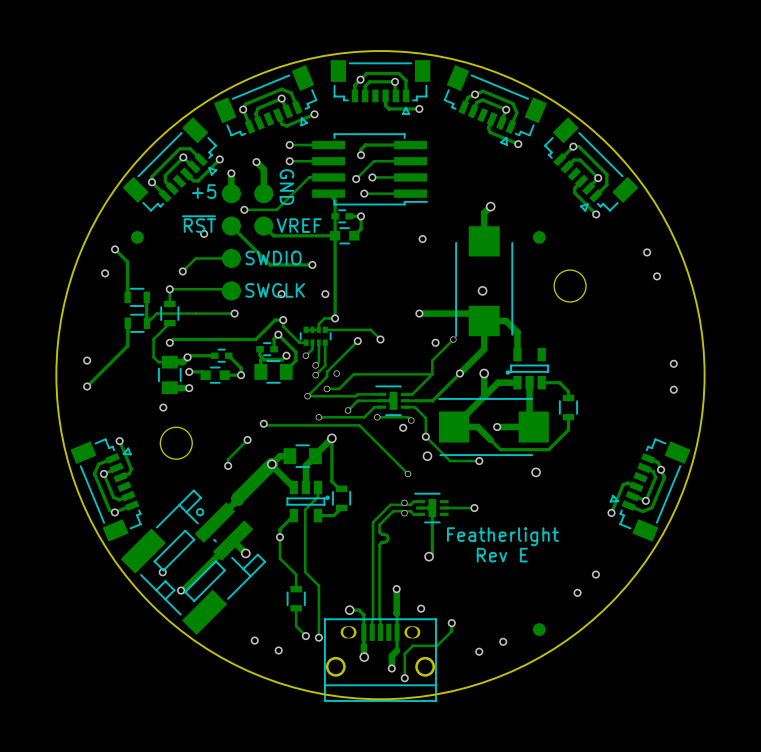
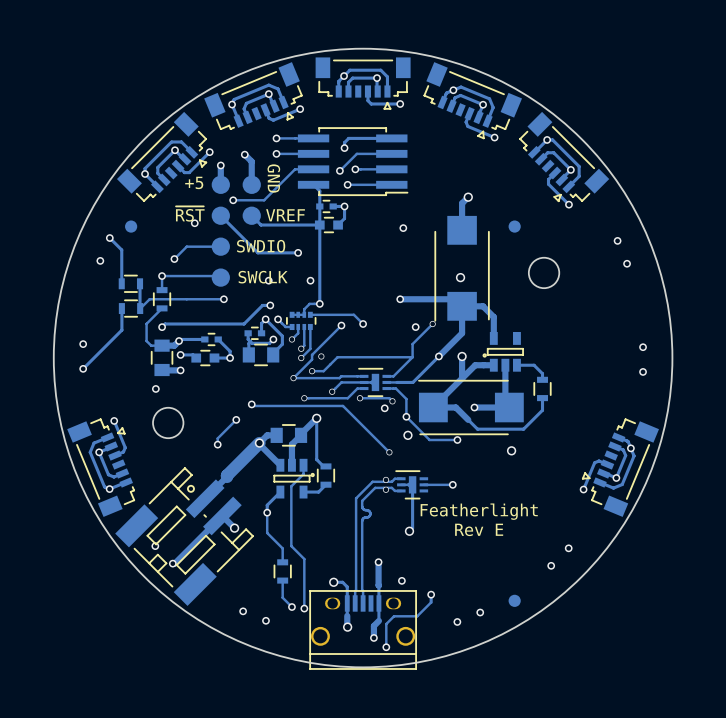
track: (283, 320) (283, 326) (291, 334) -> none
via: none -> (278, 319)

